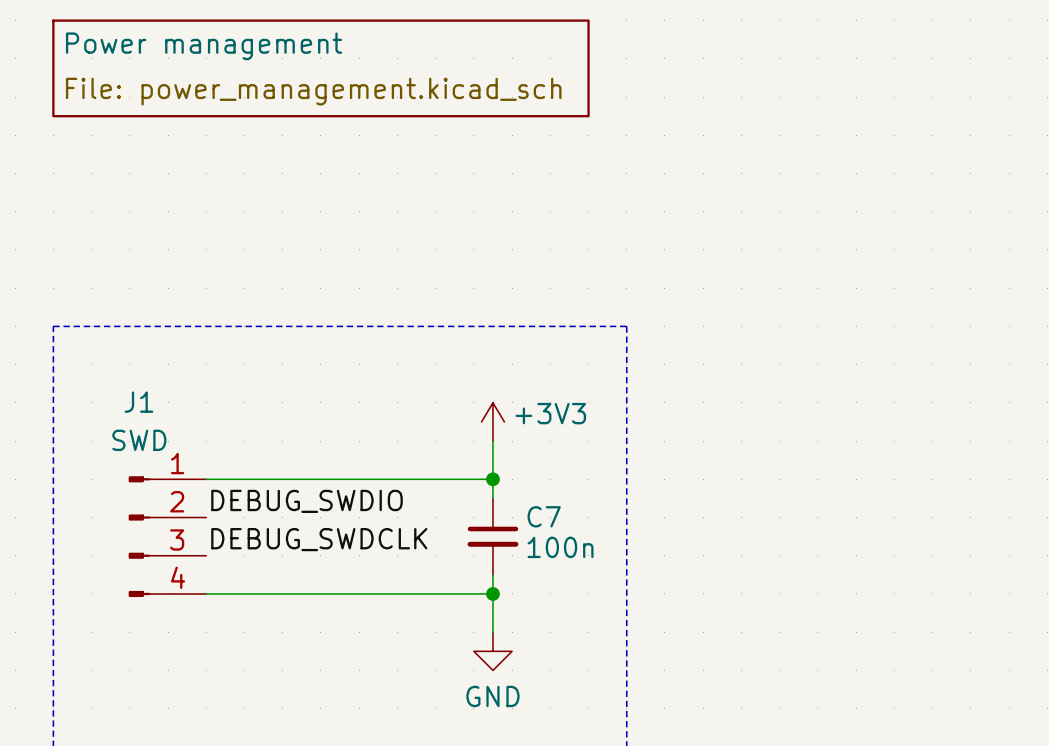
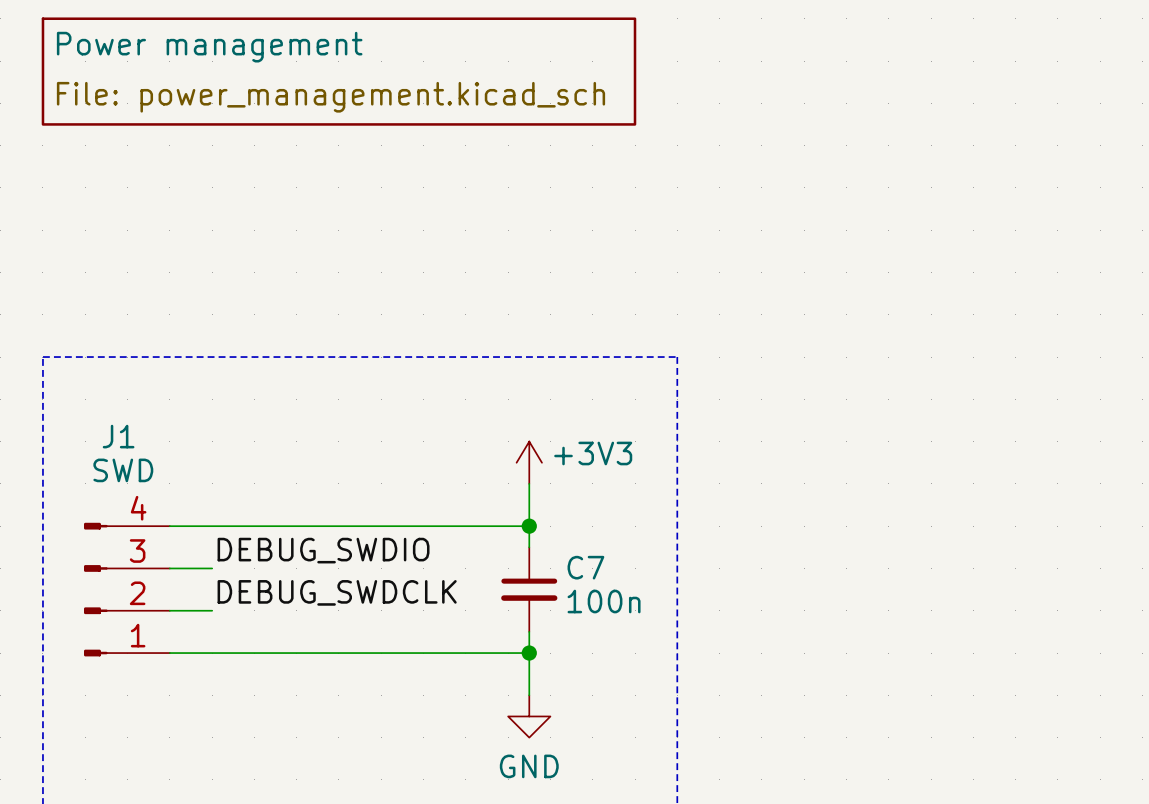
J1 flip: as is (139, 536) -> up-down (95, 589)

